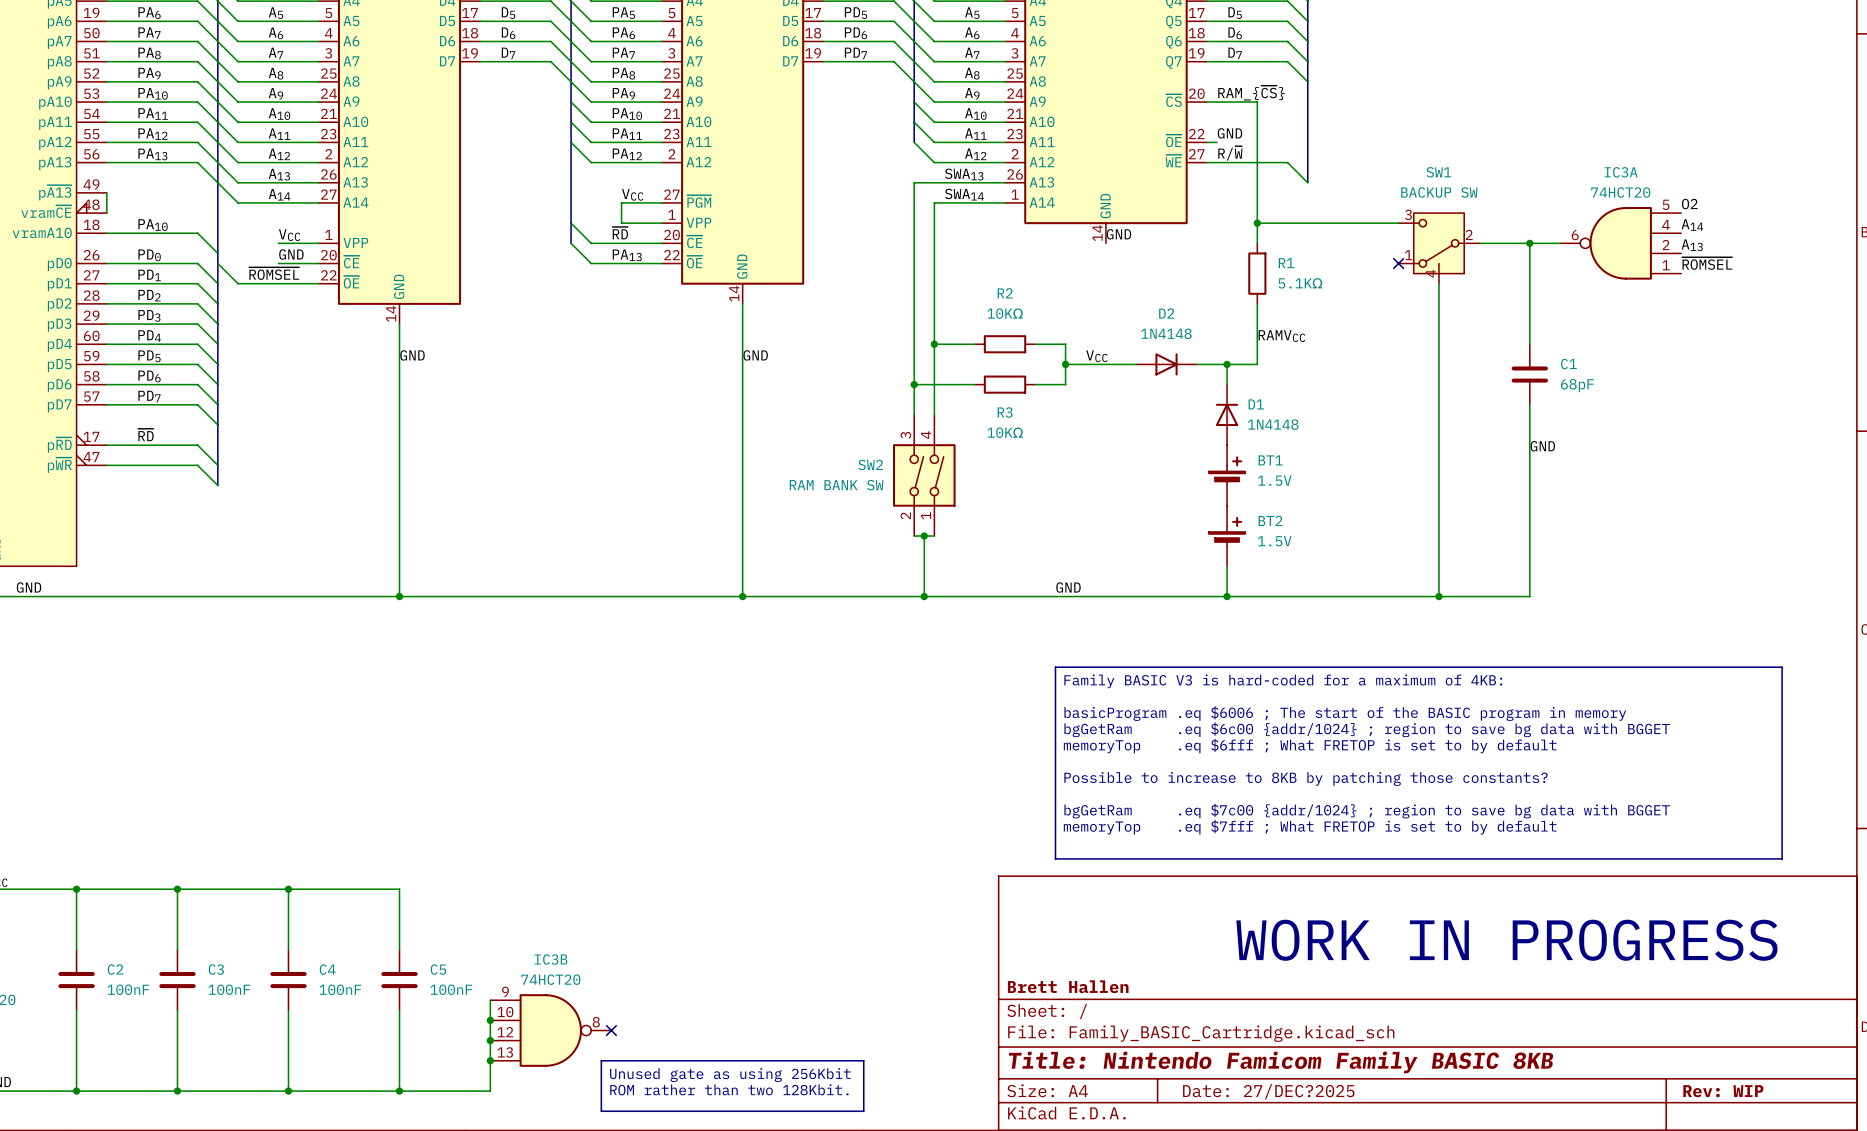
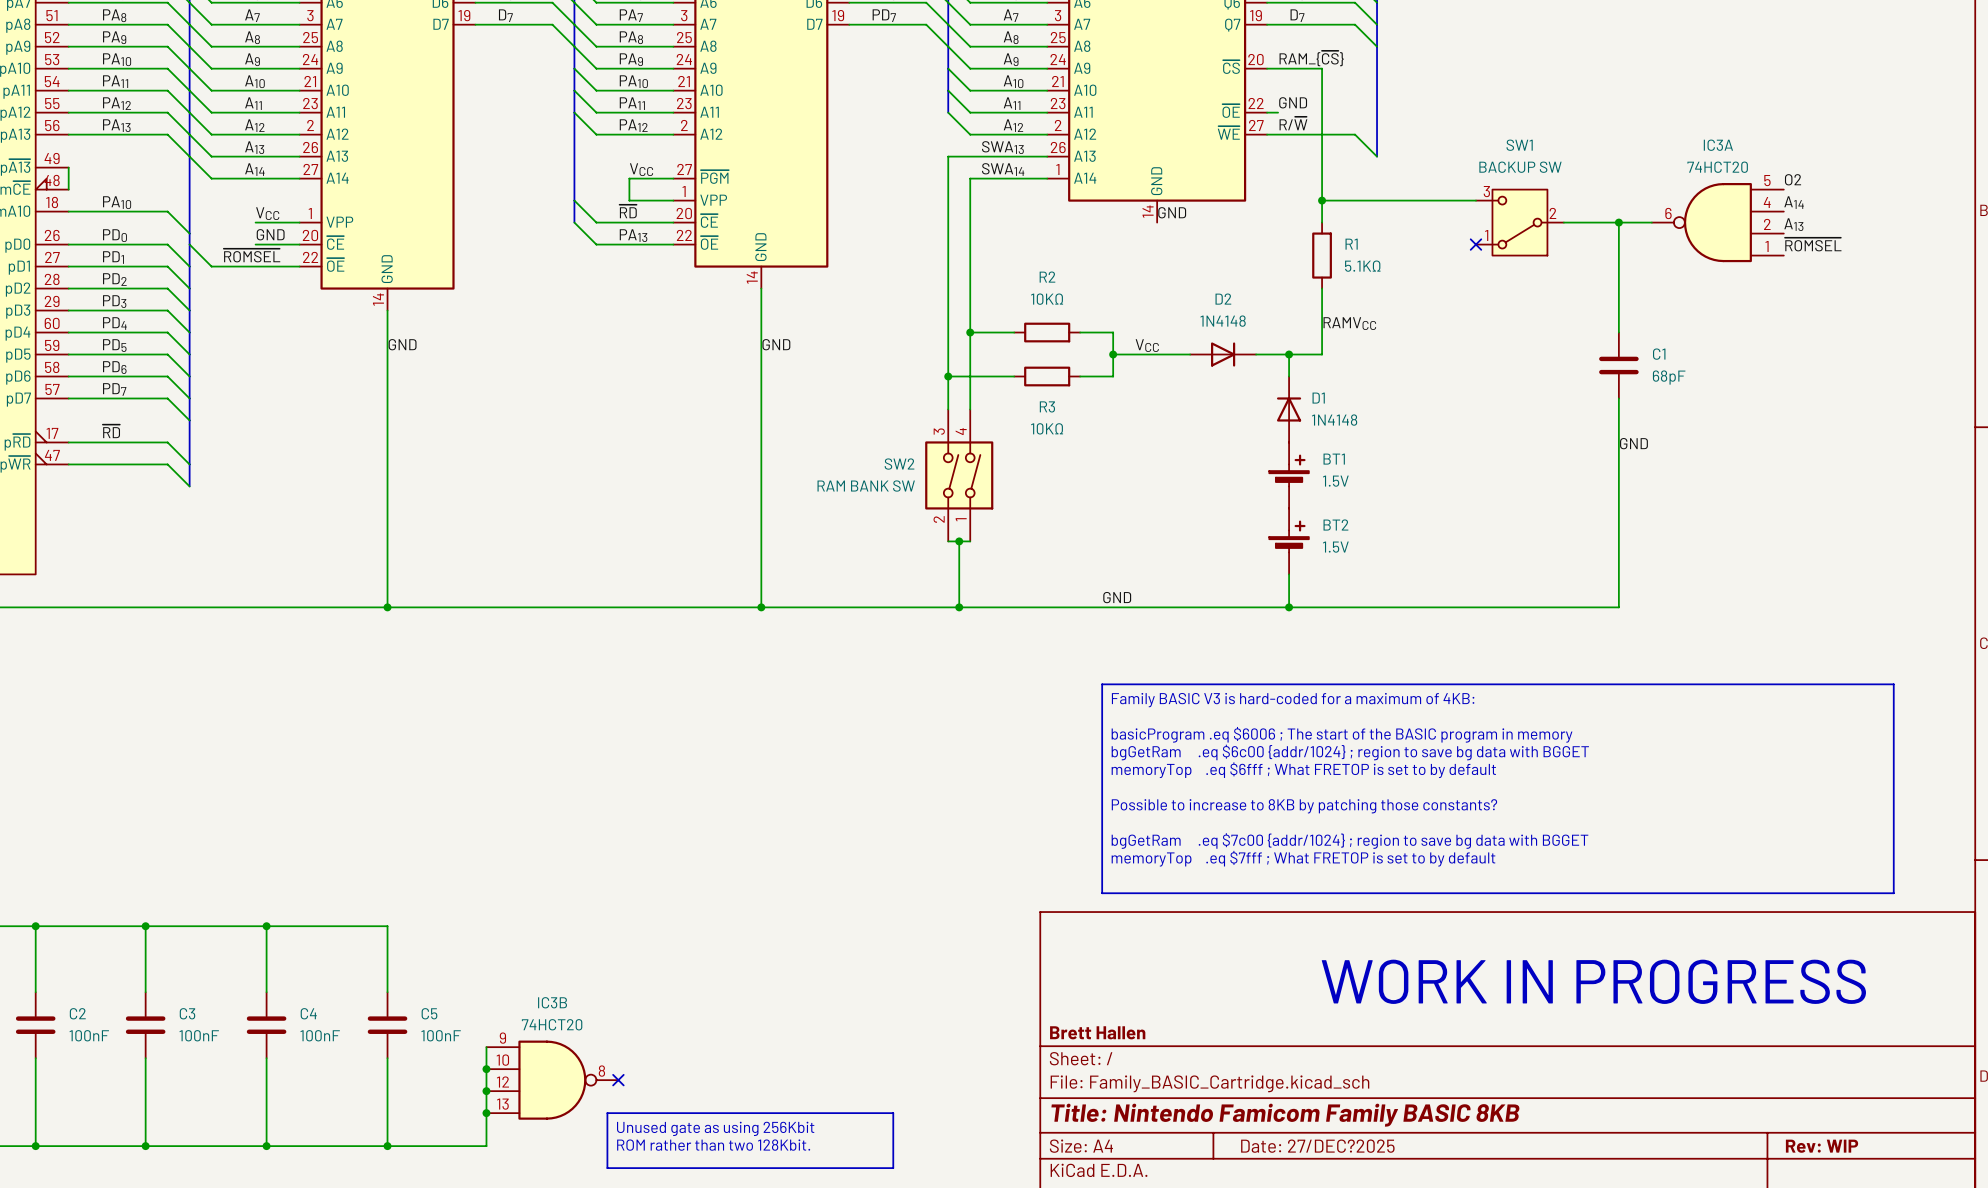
SW1 symbol: [1398, 213, 1480, 284] -> [1475, 189, 1564, 256]
wire: (1438, 283) (1438, 596) -> none
junction: (1438, 596) -> none

